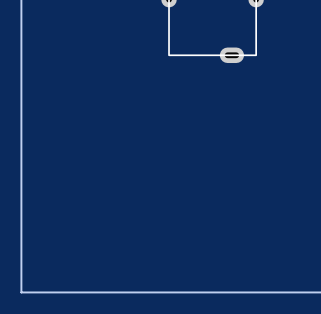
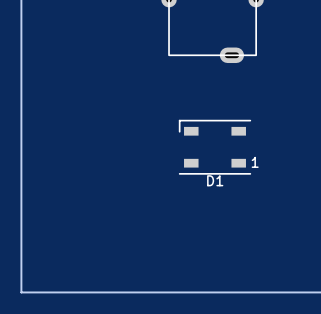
D1: none -> (215, 147)

